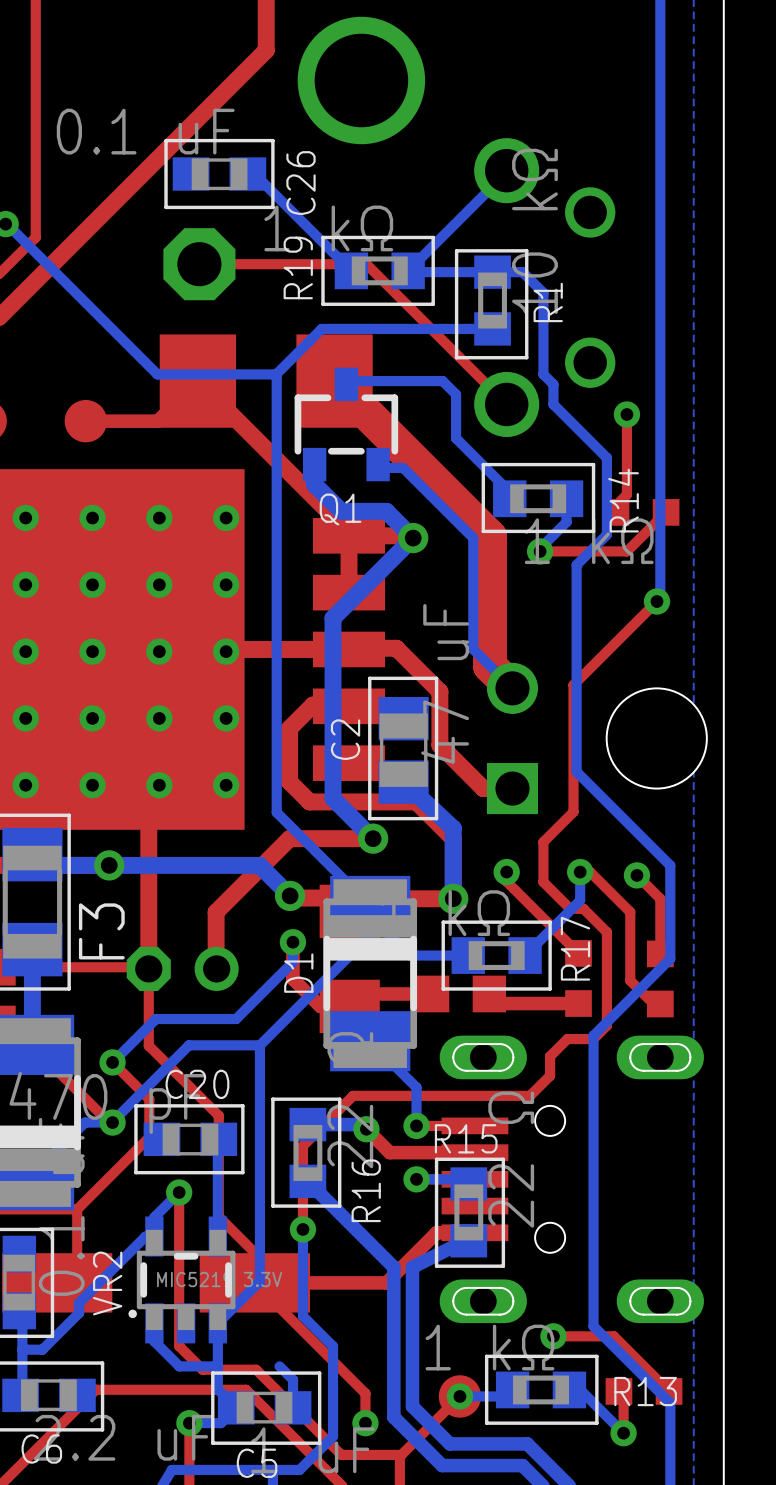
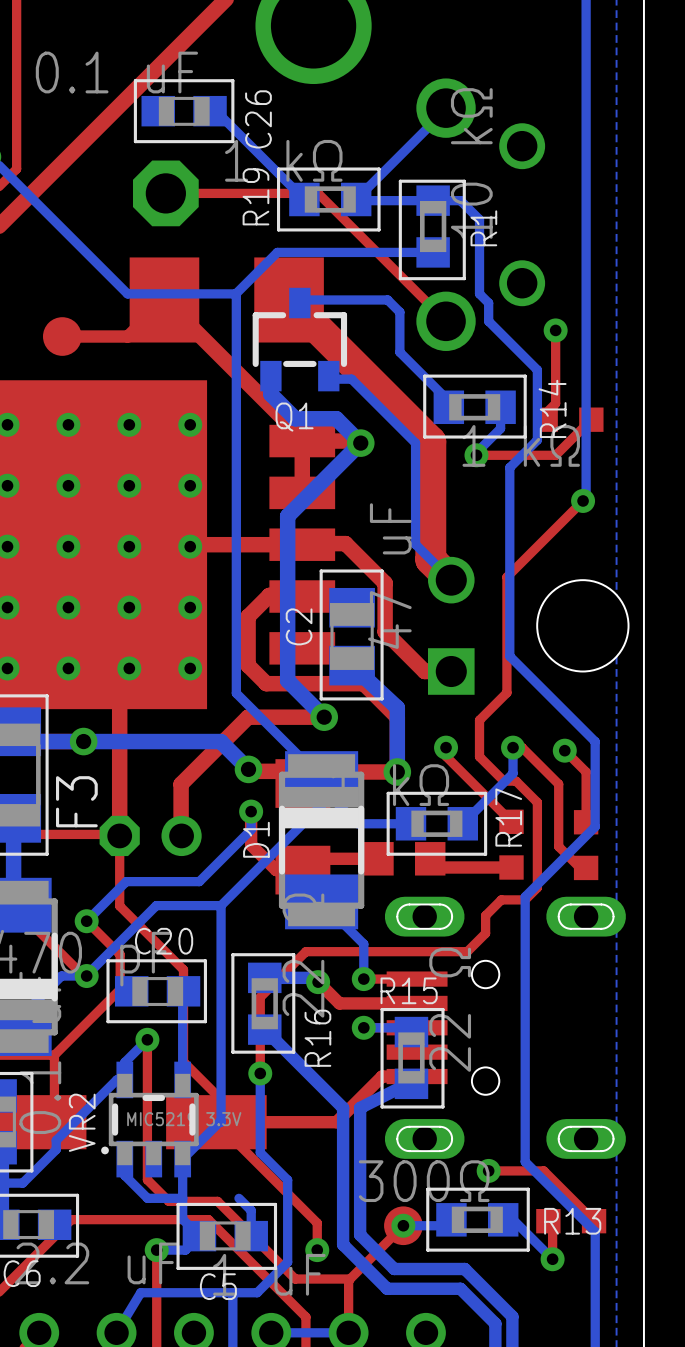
R13 value: 1 kΩ (490, 1347) -> 300Ω (424, 1181)

